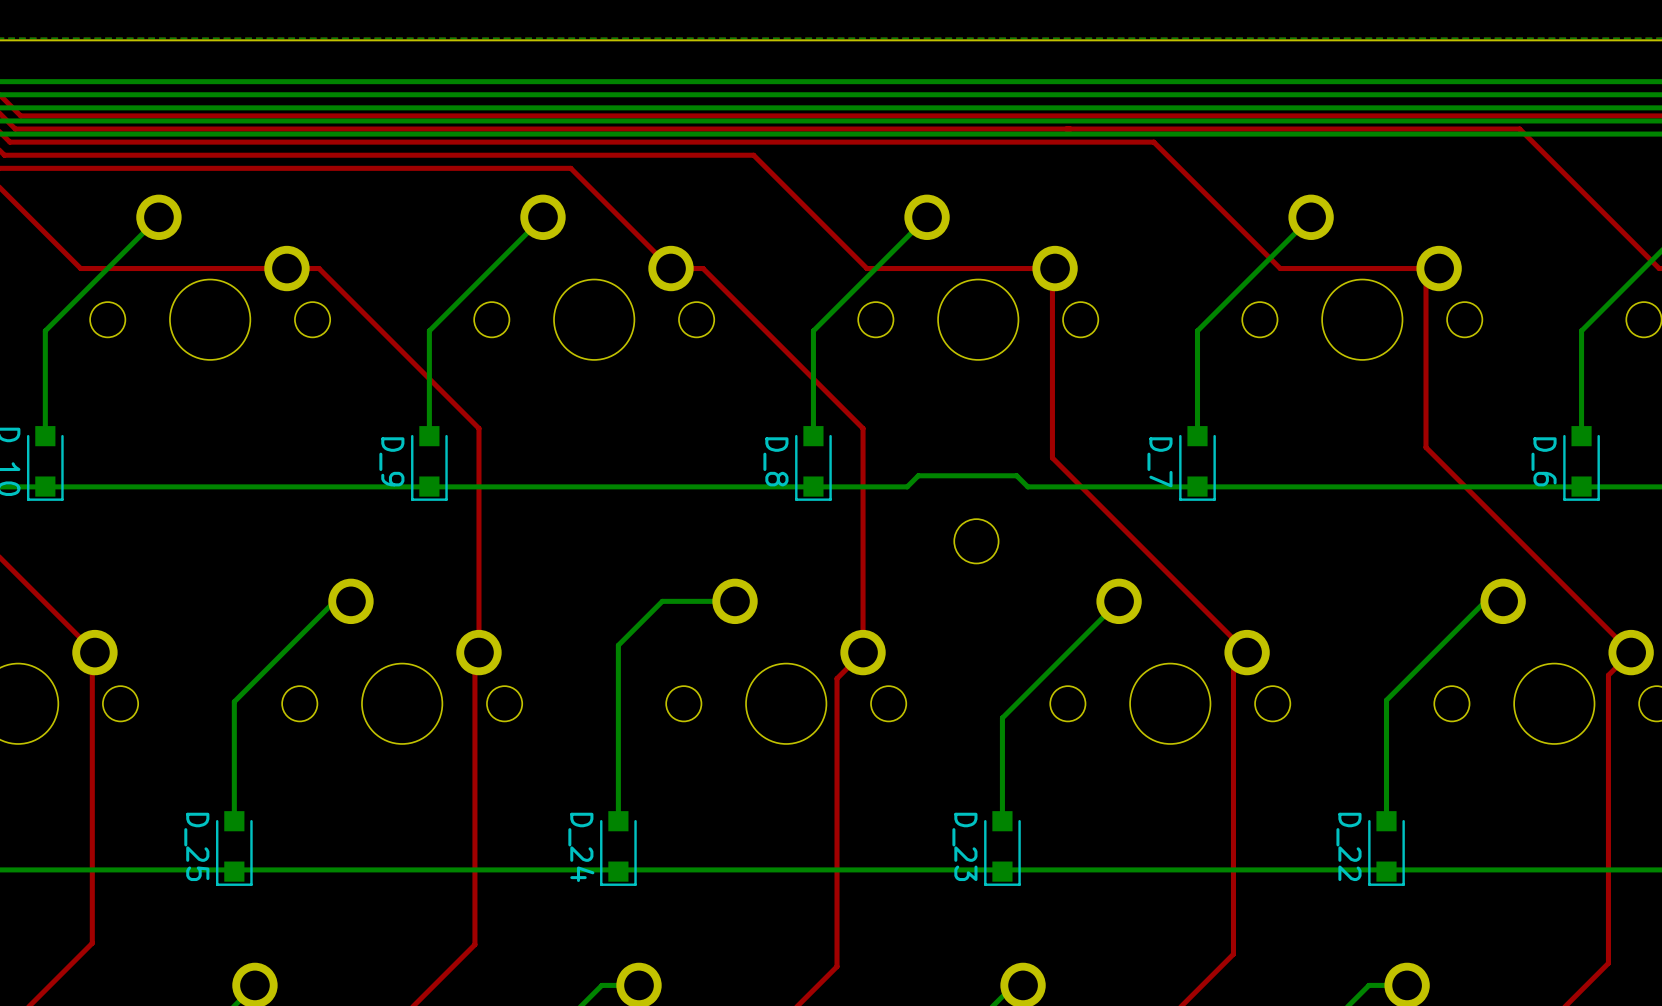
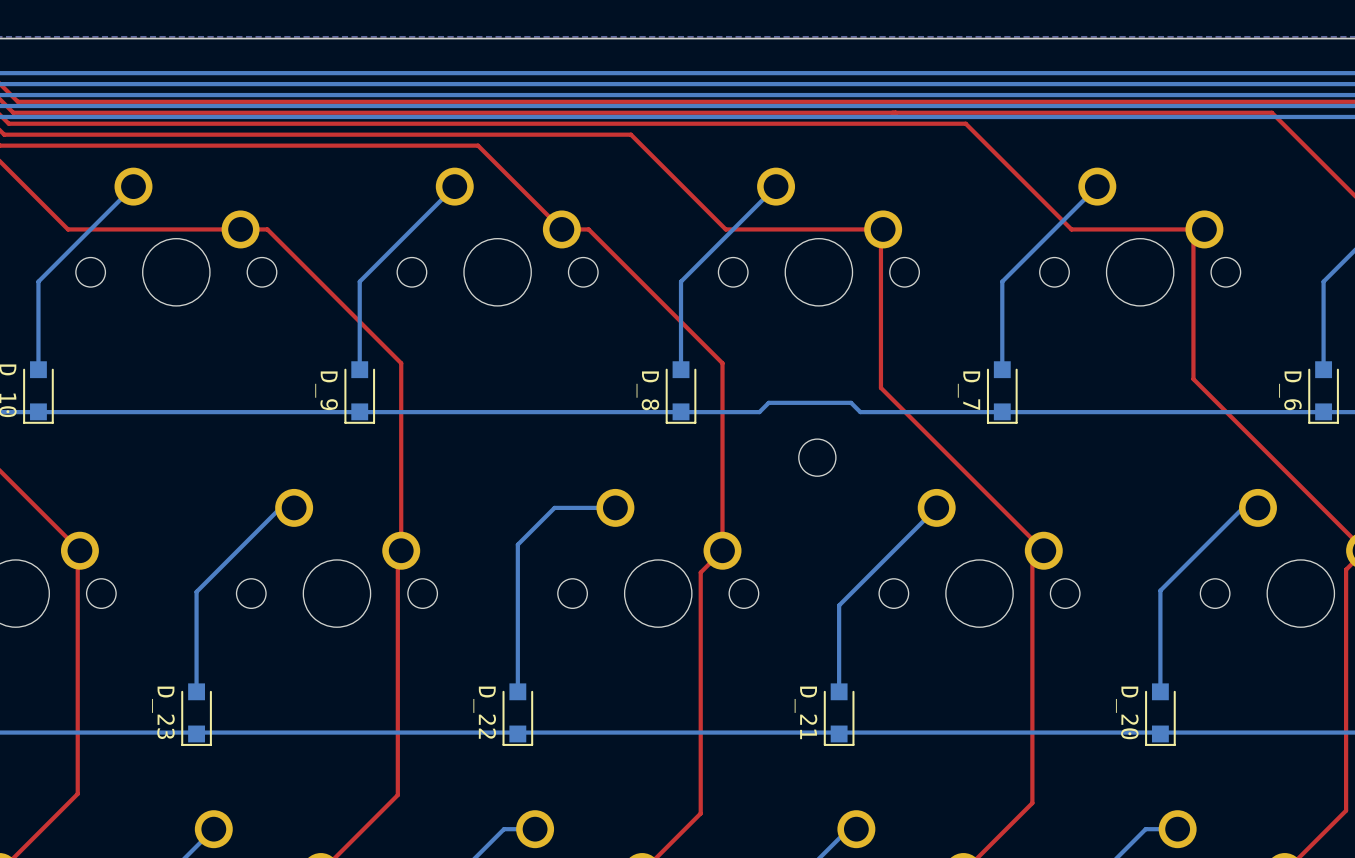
D_25 name: D_25 (196, 846) -> D_23 (163, 712)
D_23 name: D_23 (964, 846) -> D_21 (805, 712)
D_22 name: D_22 (1348, 846) -> D_20 (1127, 712)
D_24 name: D_24 (581, 847) -> D_22 (484, 712)

